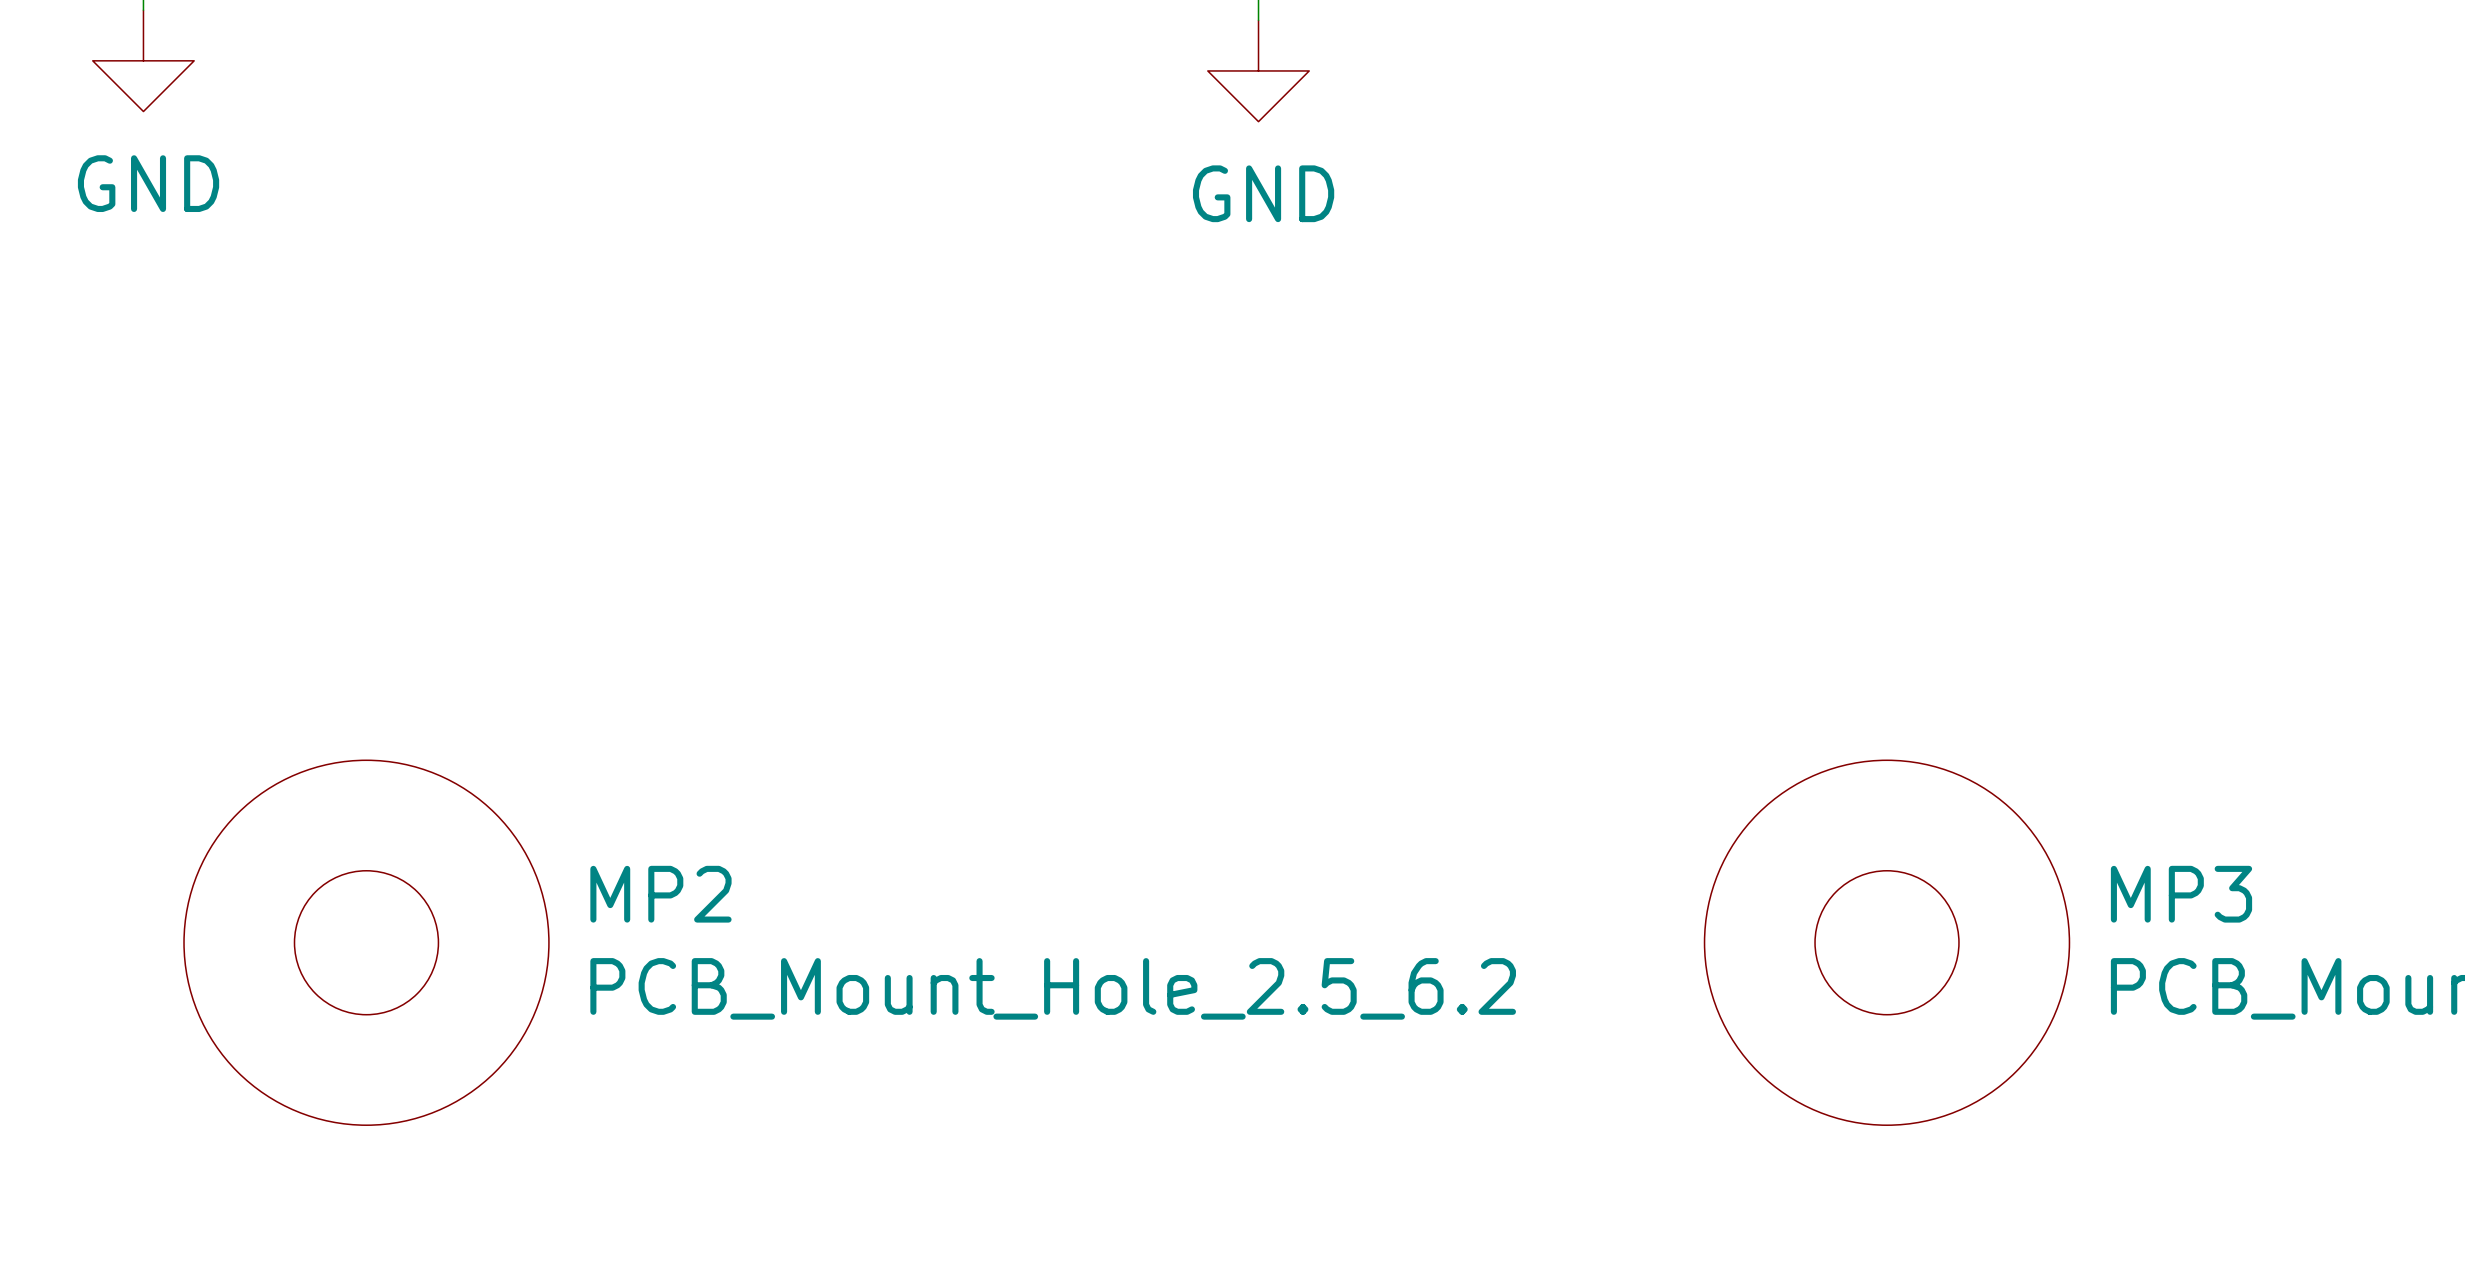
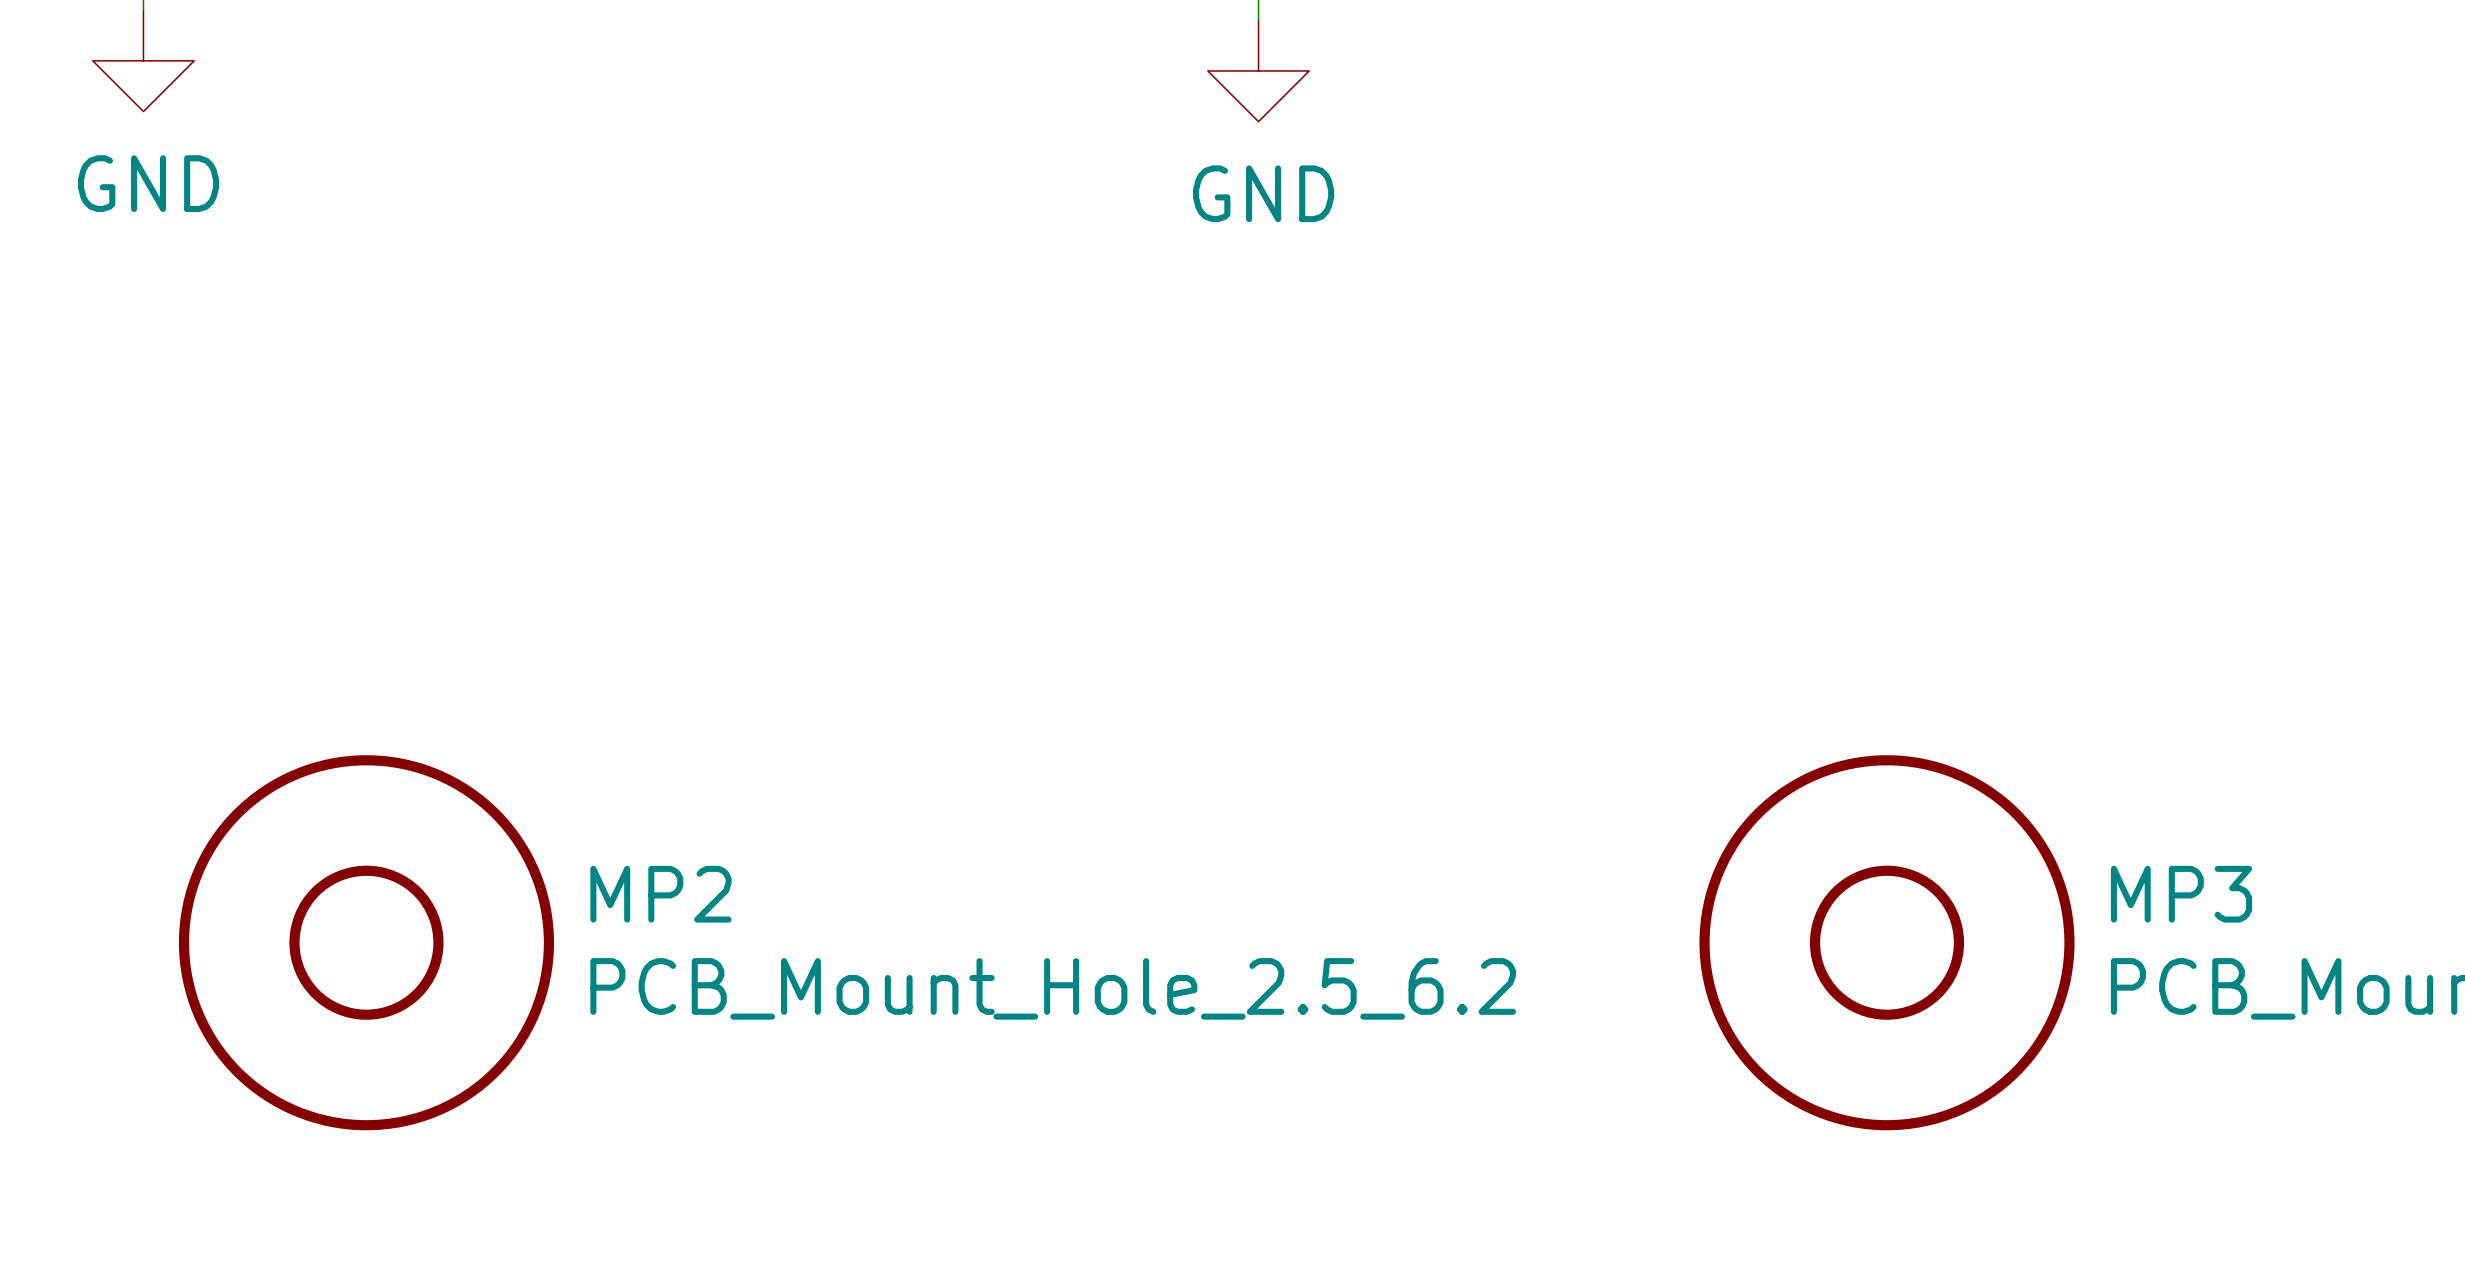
MP2 symbol: [184, 760, 549, 1126] -> [178, 755, 555, 1131]
MP3 symbol: [1704, 760, 2070, 1126] -> [1699, 755, 2075, 1131]

